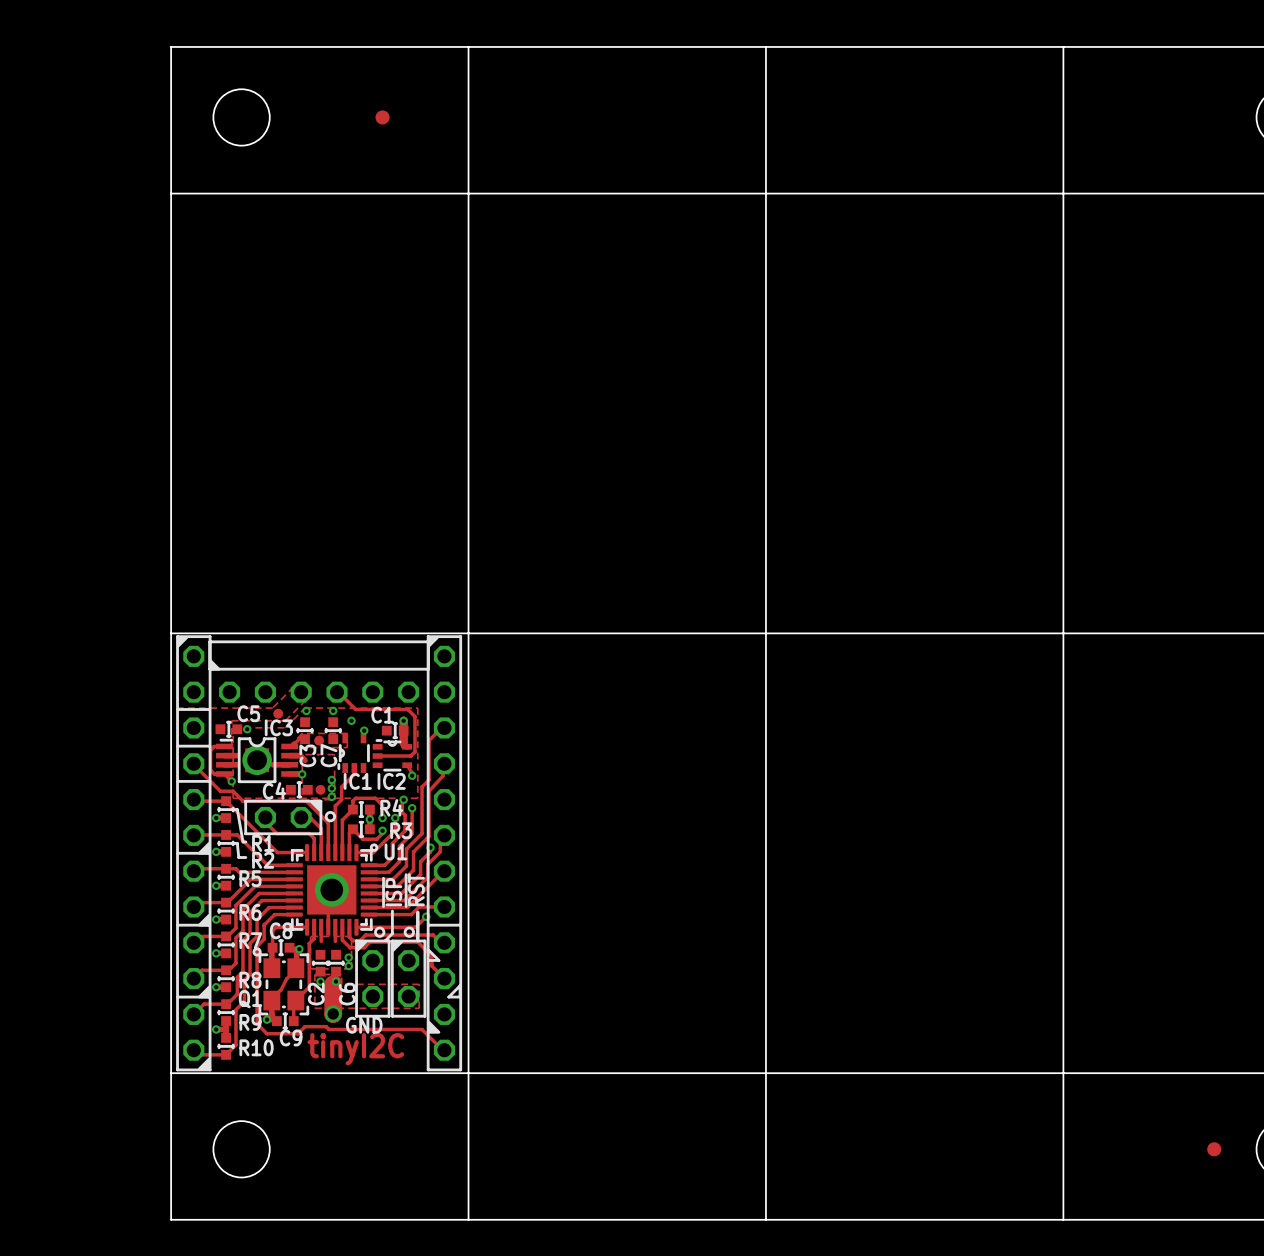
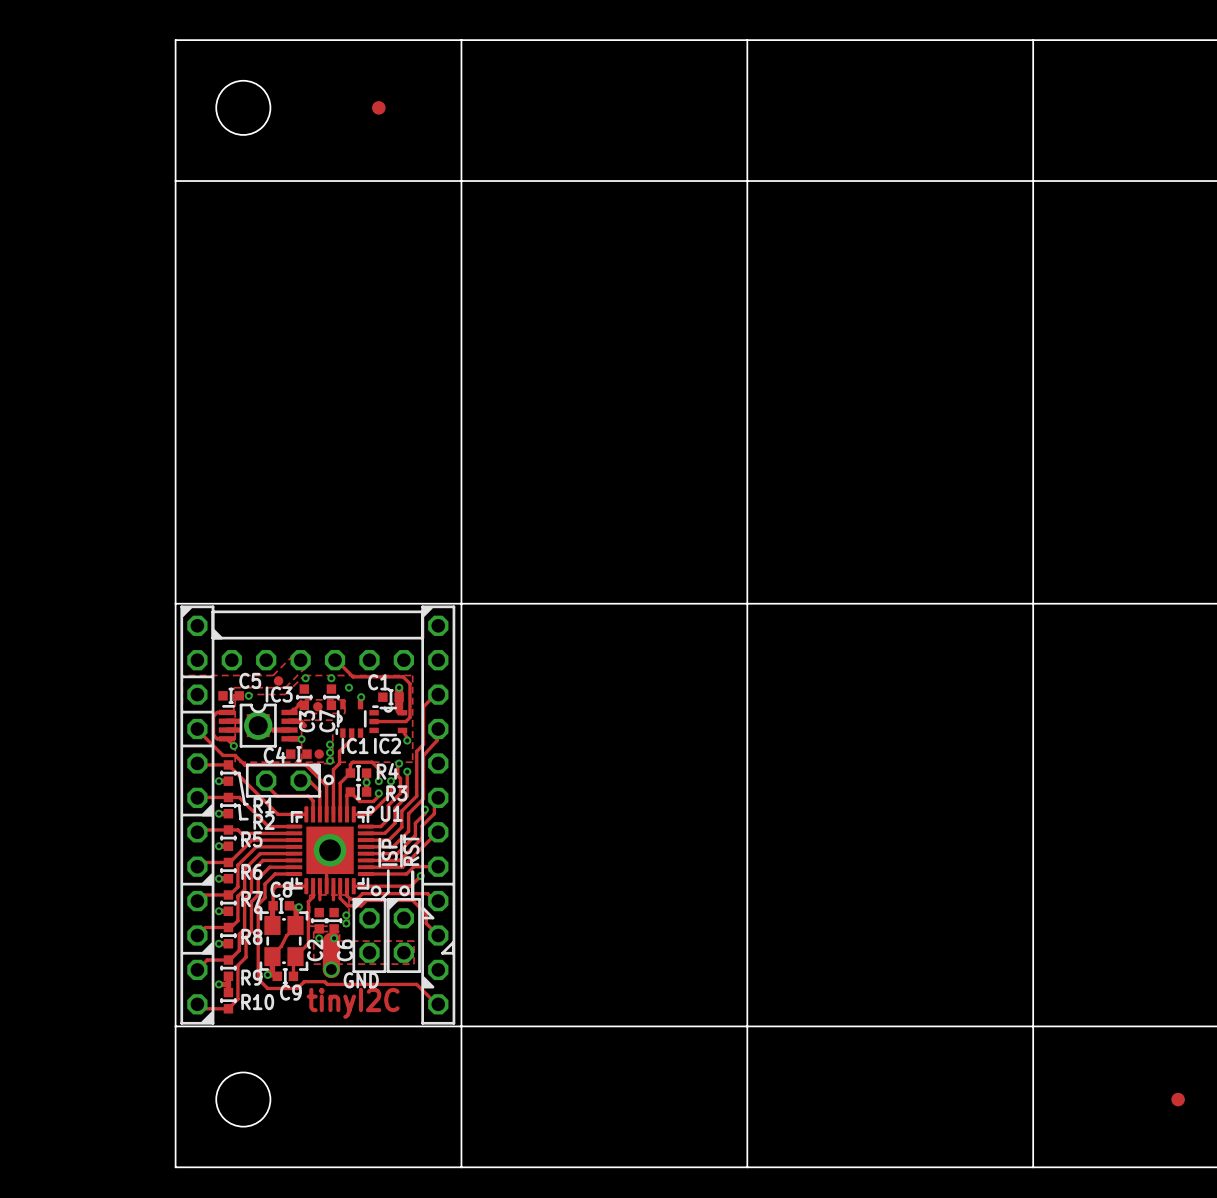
Q1 name: Q1 (250, 999) -> none

